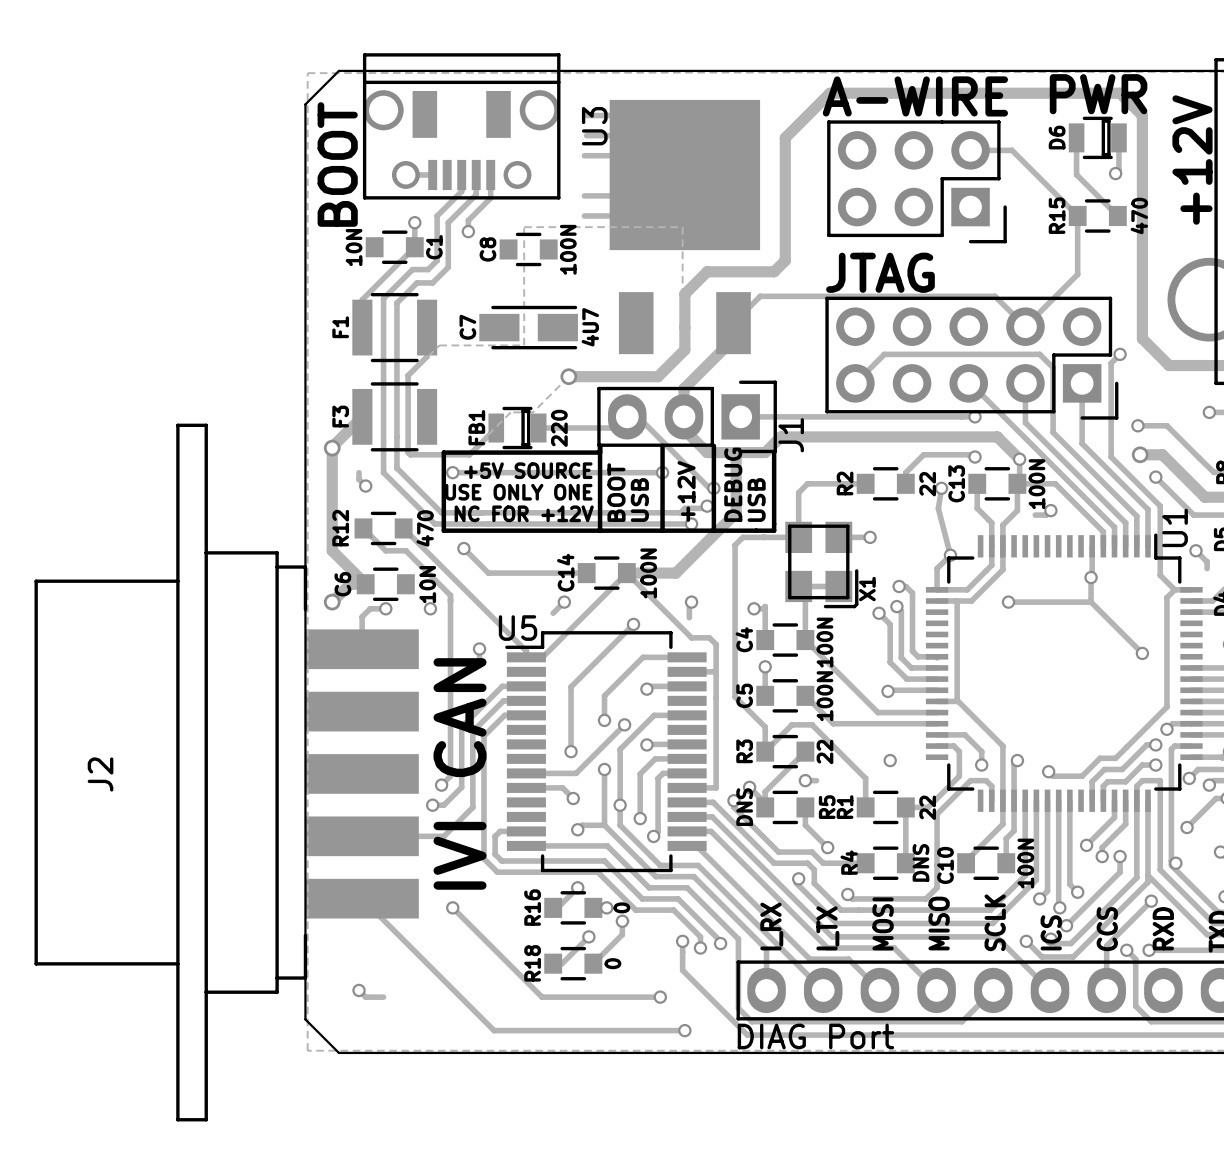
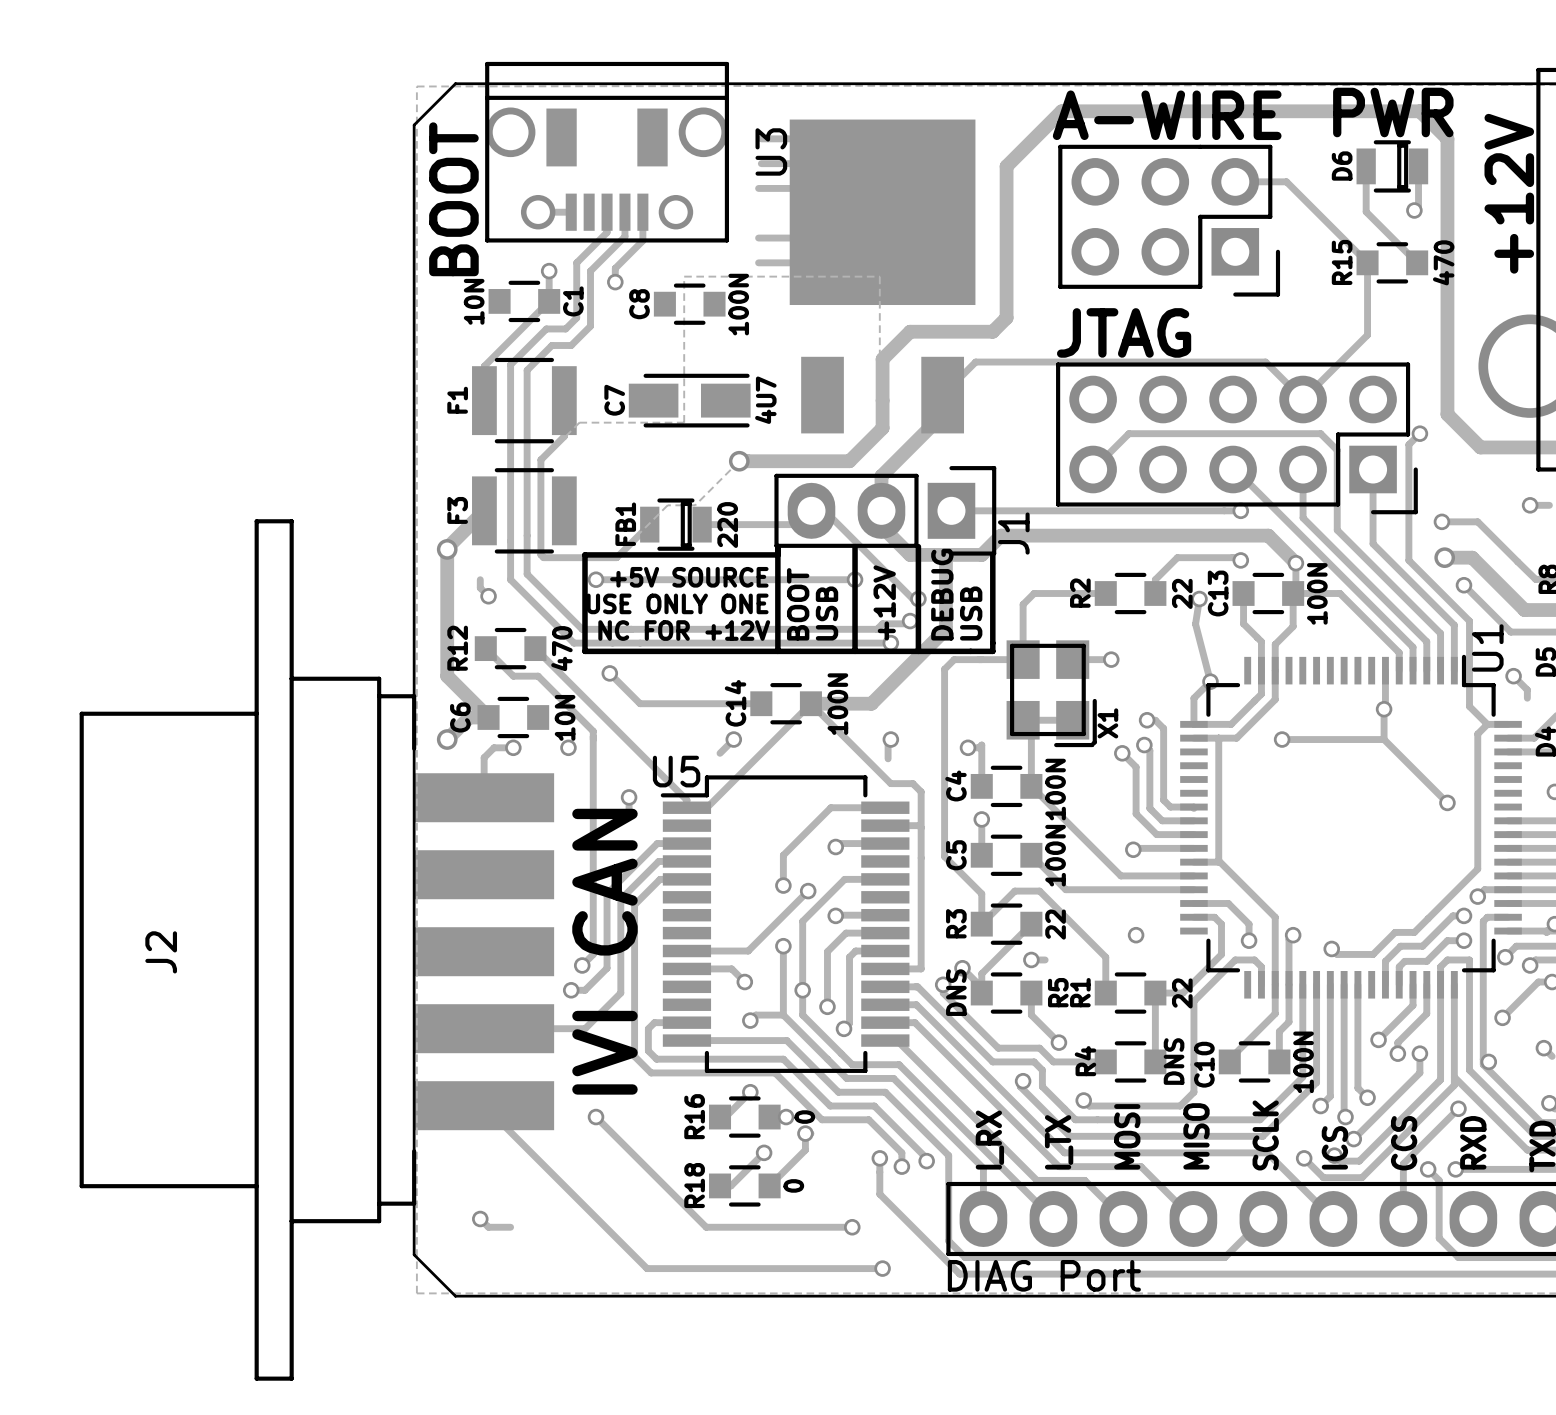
track: (1050, 510) (1046, 515) (1035, 515) -> none
via: (1050, 510) -> none
track: (633, 624) (571, 686) (571, 751) -> none
via: (633, 624) -> none
via: (571, 751) -> none

